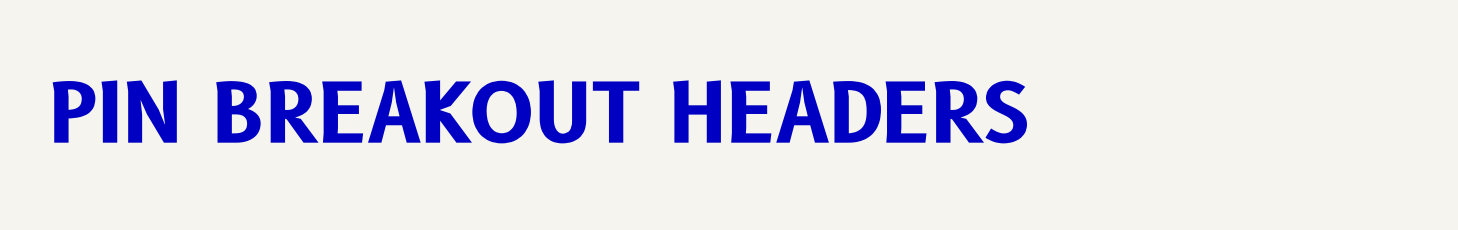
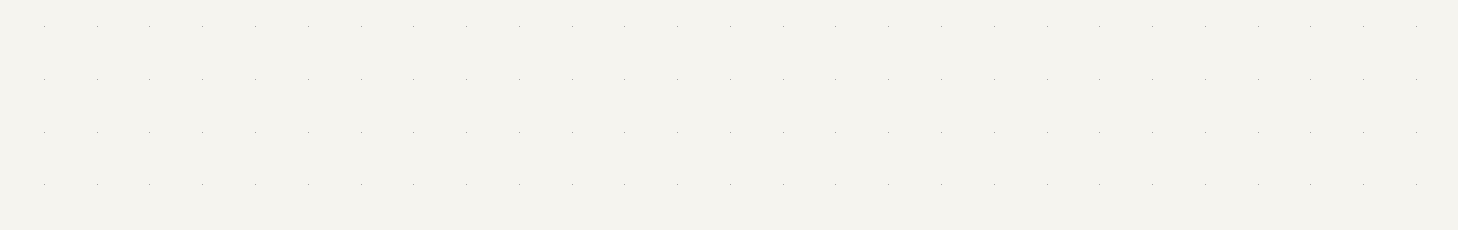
text: PIN BREAKOUT HEADERS (539, 111) -> none

